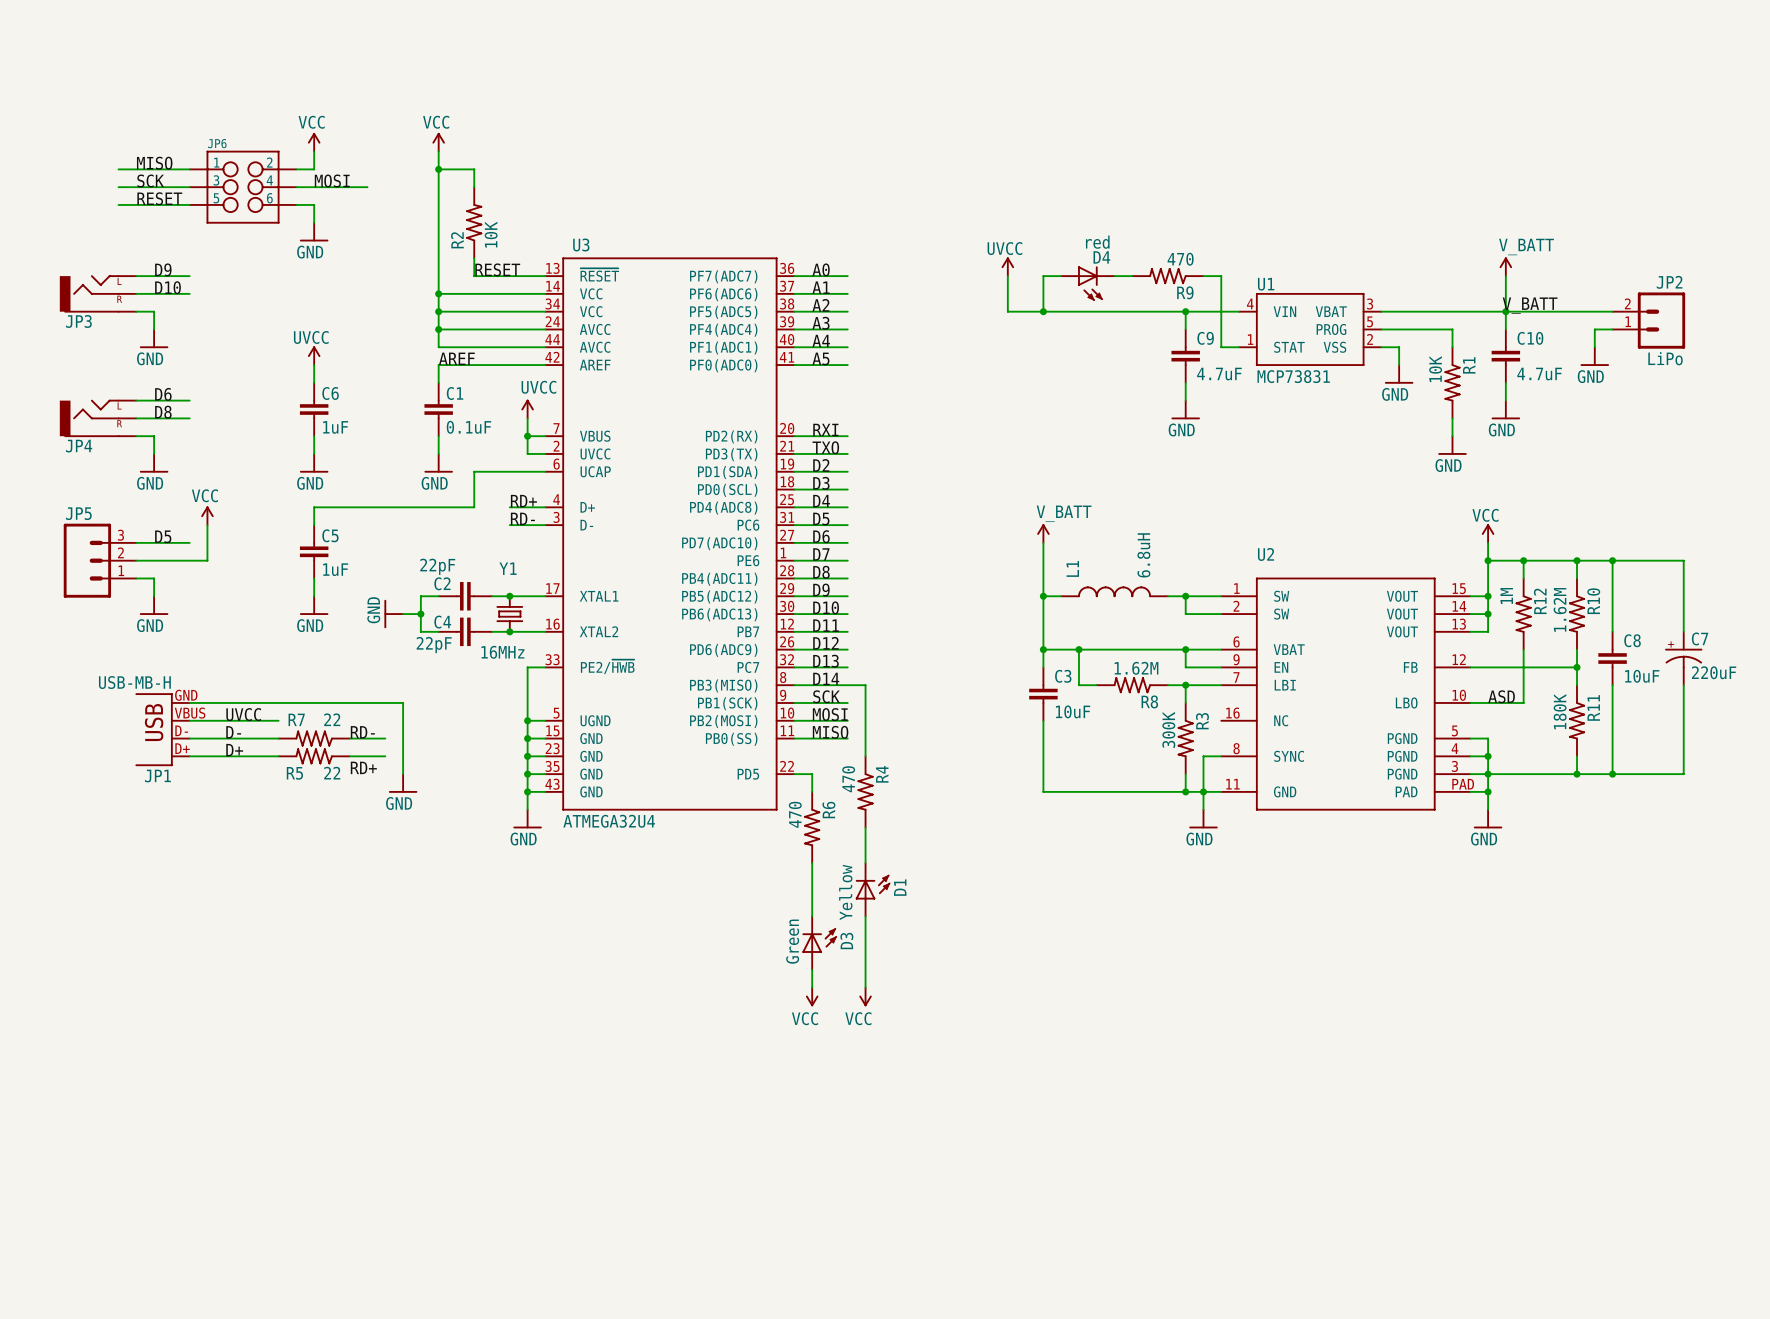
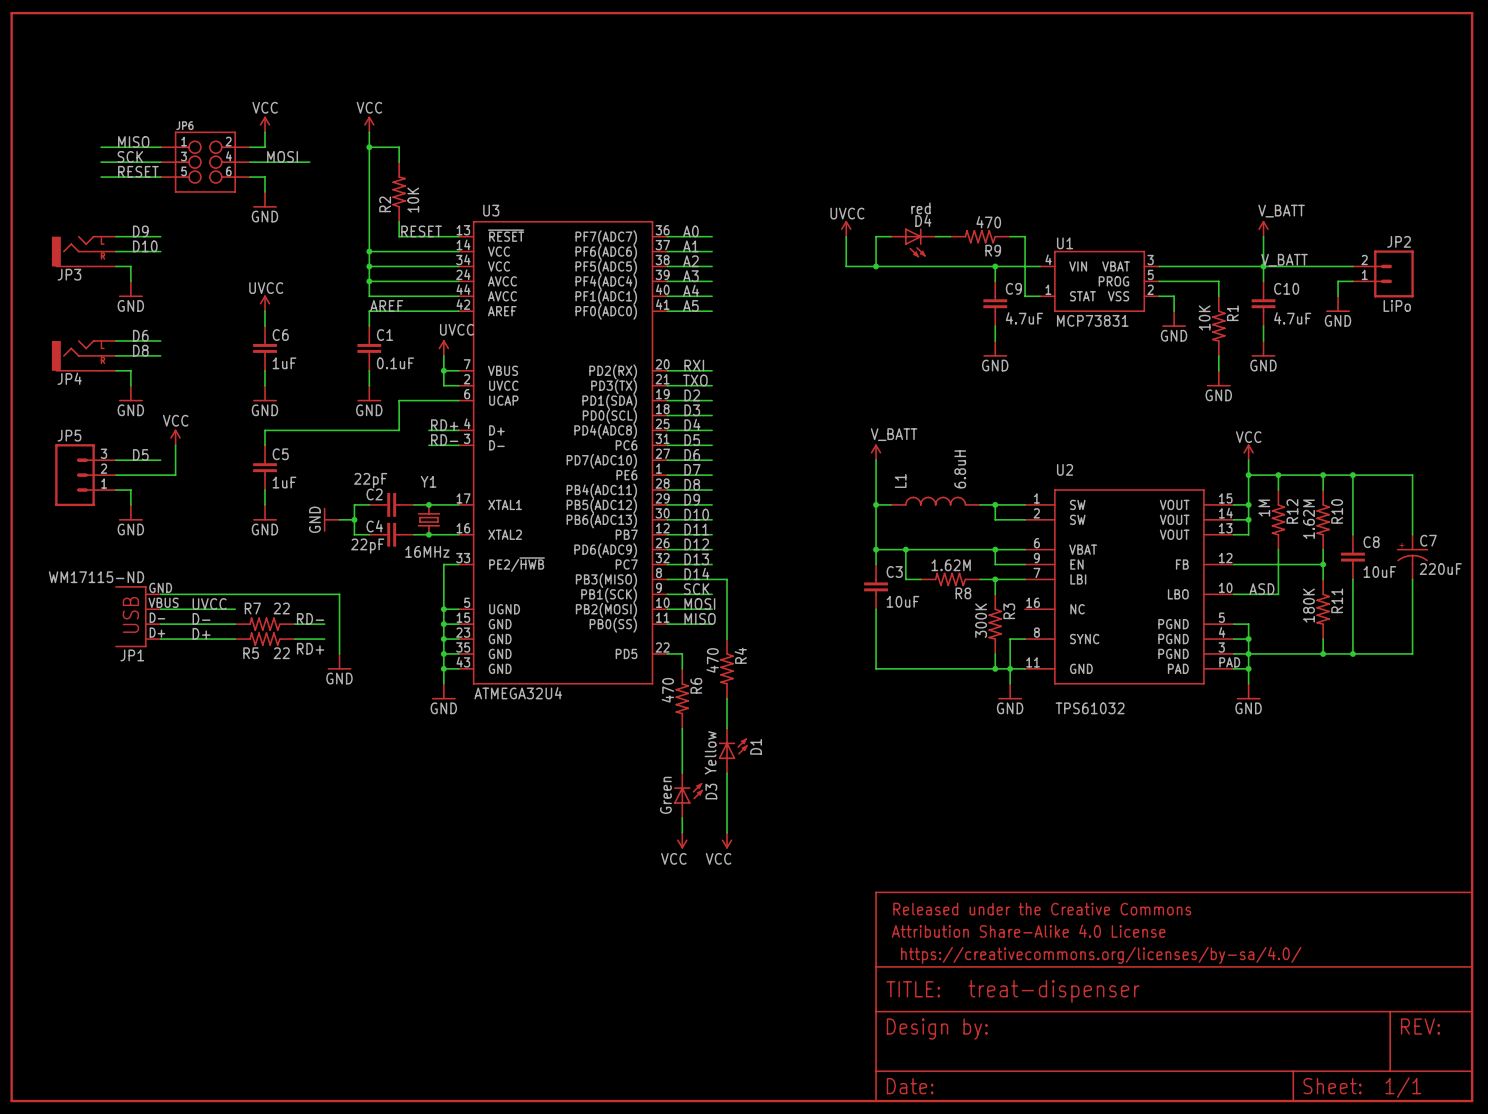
part: none -> (741, 557)
JP1 value: USB-MB-H (134, 682) -> WM17115-ND (96, 577)
U2 value: none -> TPS61032 (1090, 708)
part: none -> (1174, 996)

